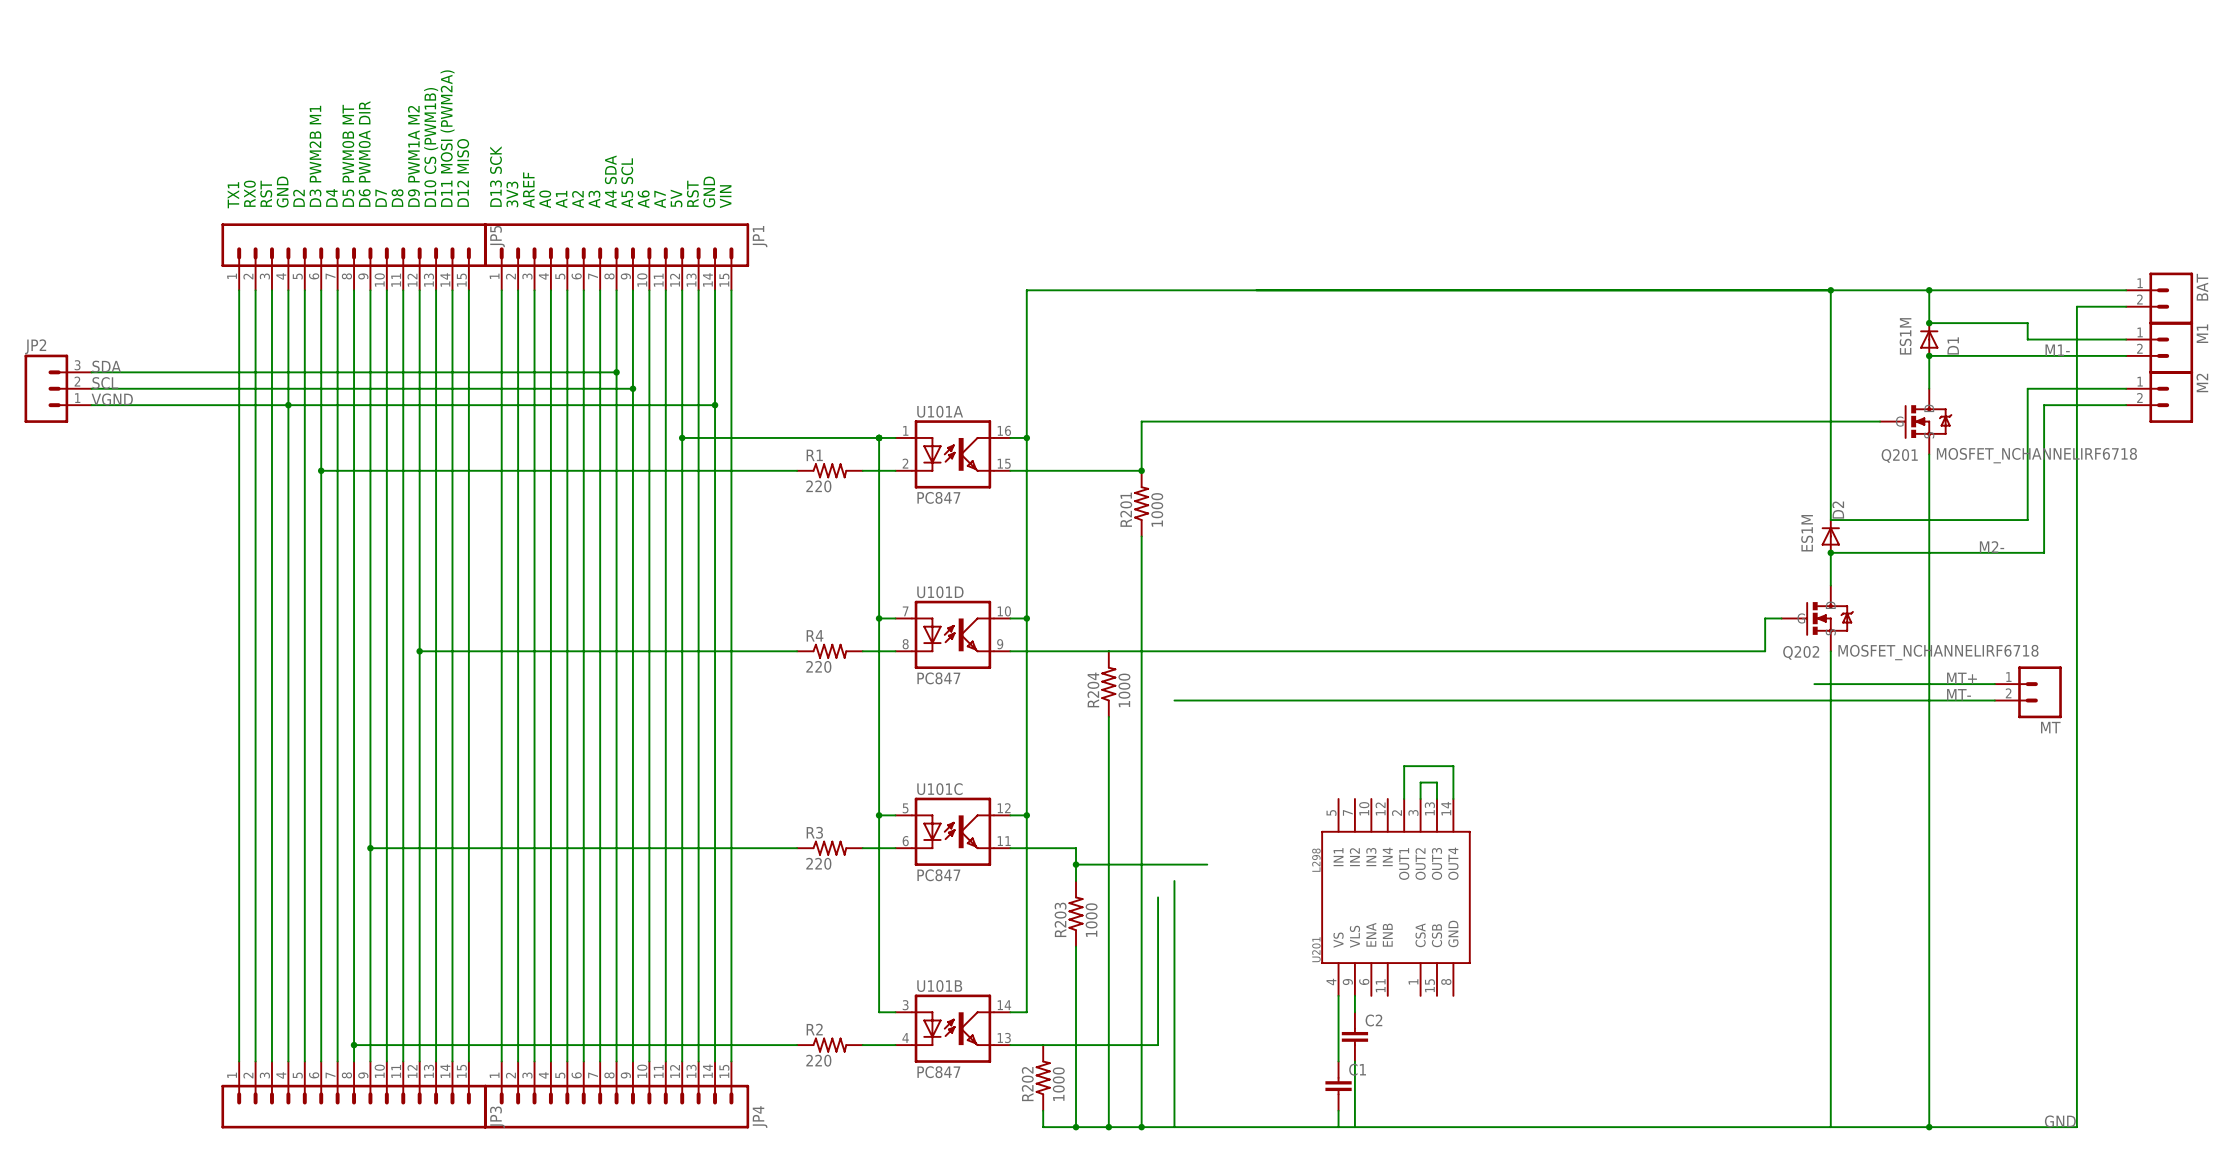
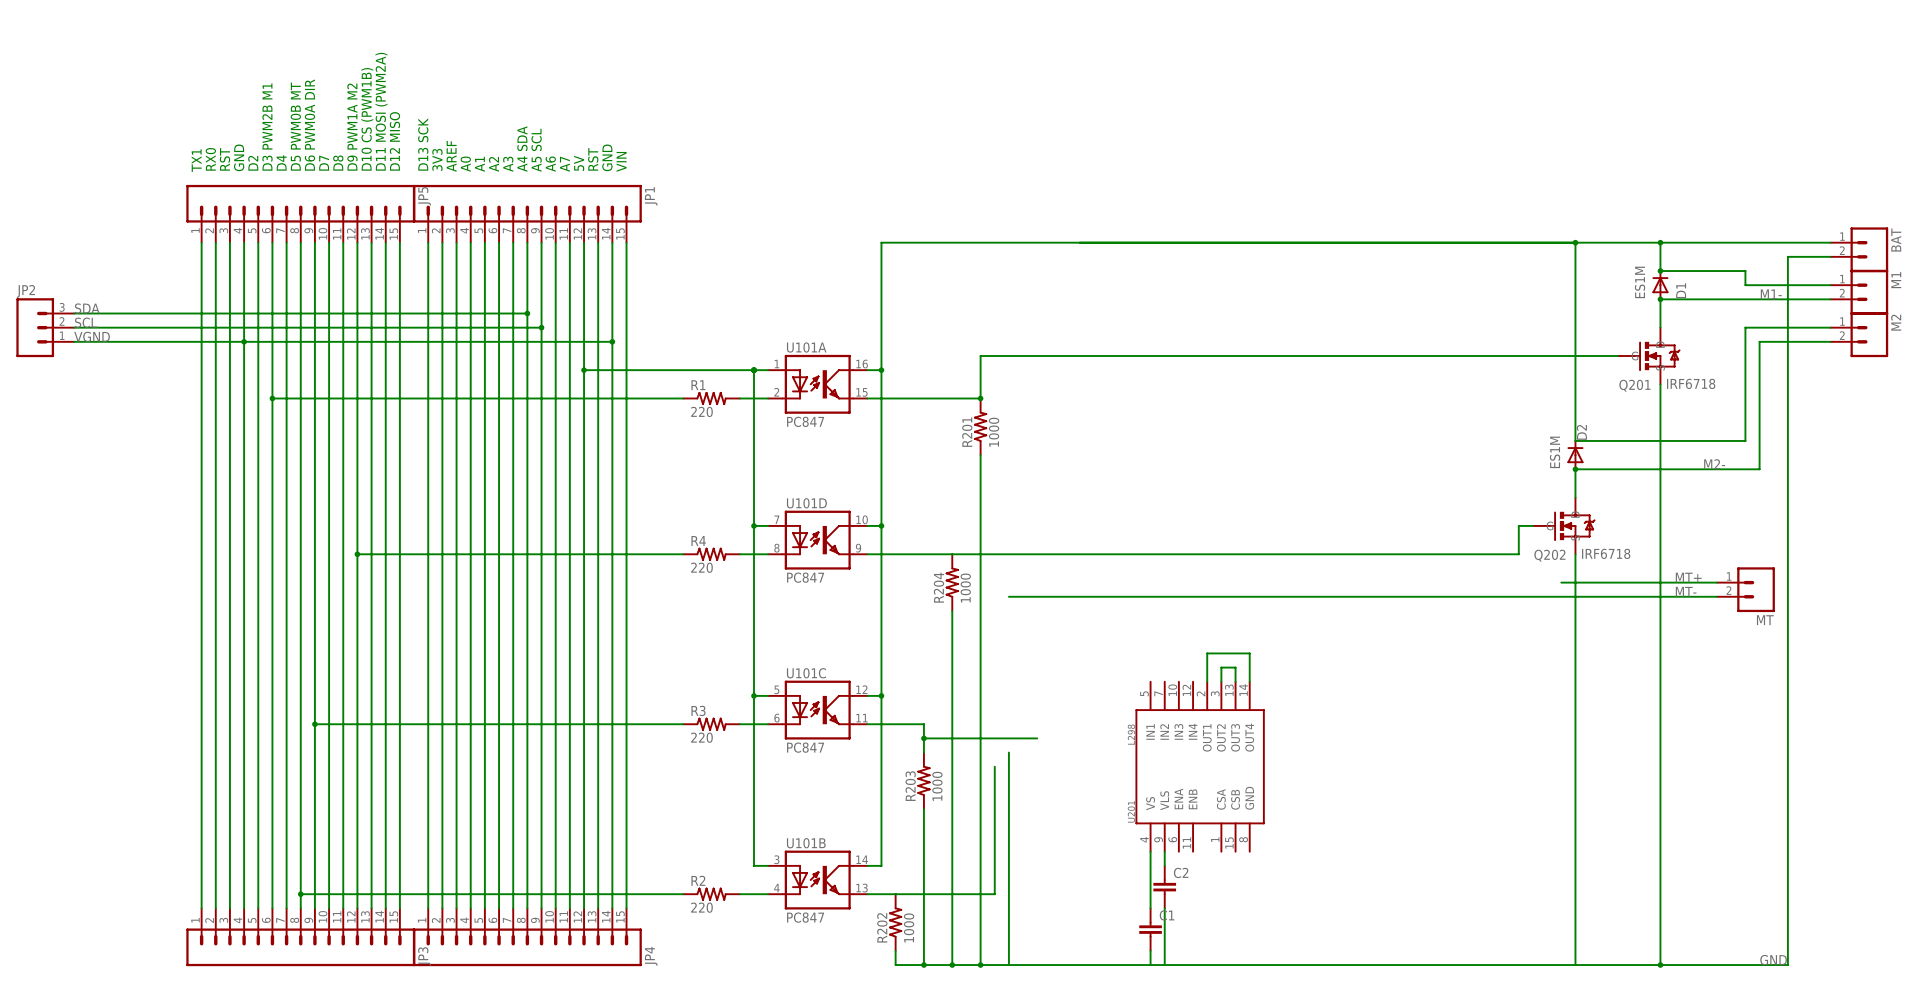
Q201 value: MOSFET_NCHANNELIRF6718 (2036, 455) -> IRF6718 (1691, 383)
Q202 value: MOSFET_NCHANNELIRF6718 (1938, 652) -> IRF6718 (1606, 553)

